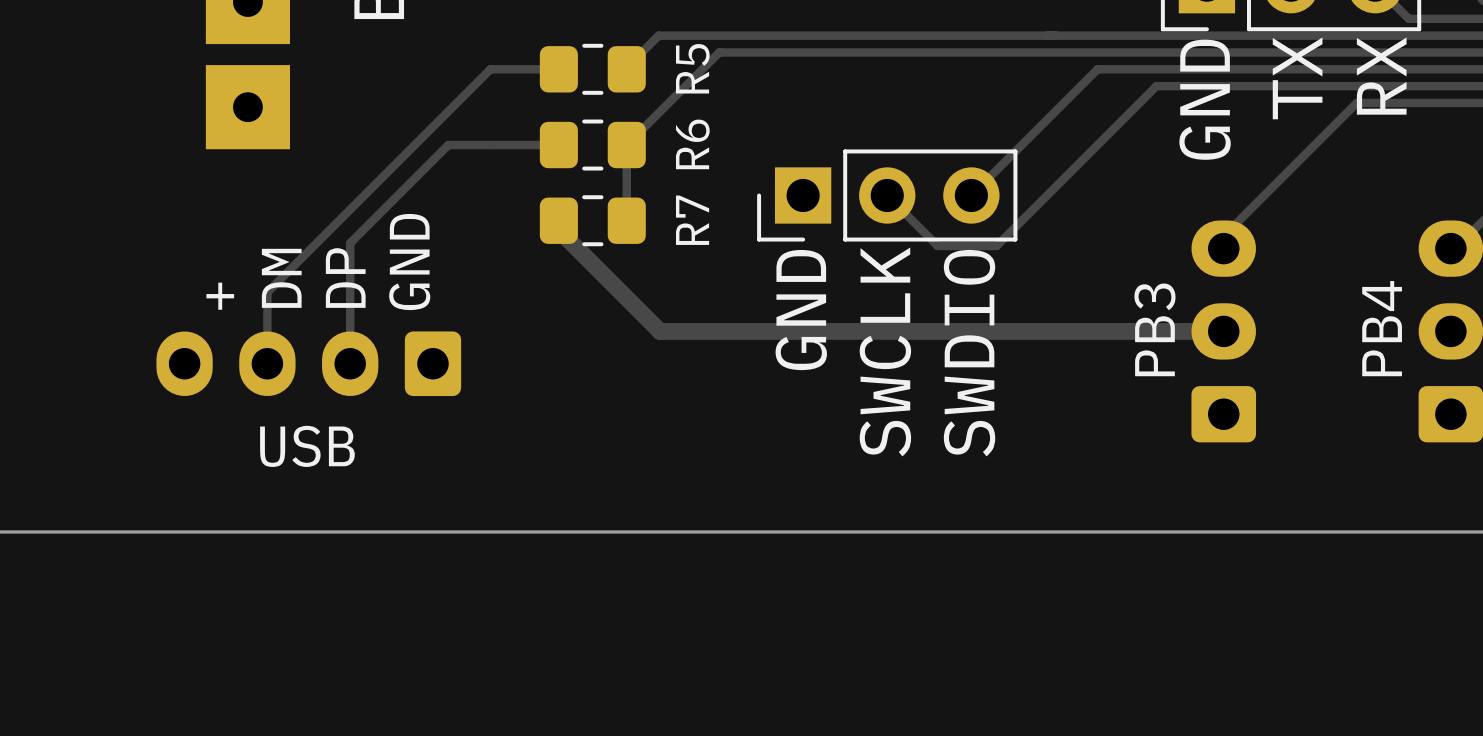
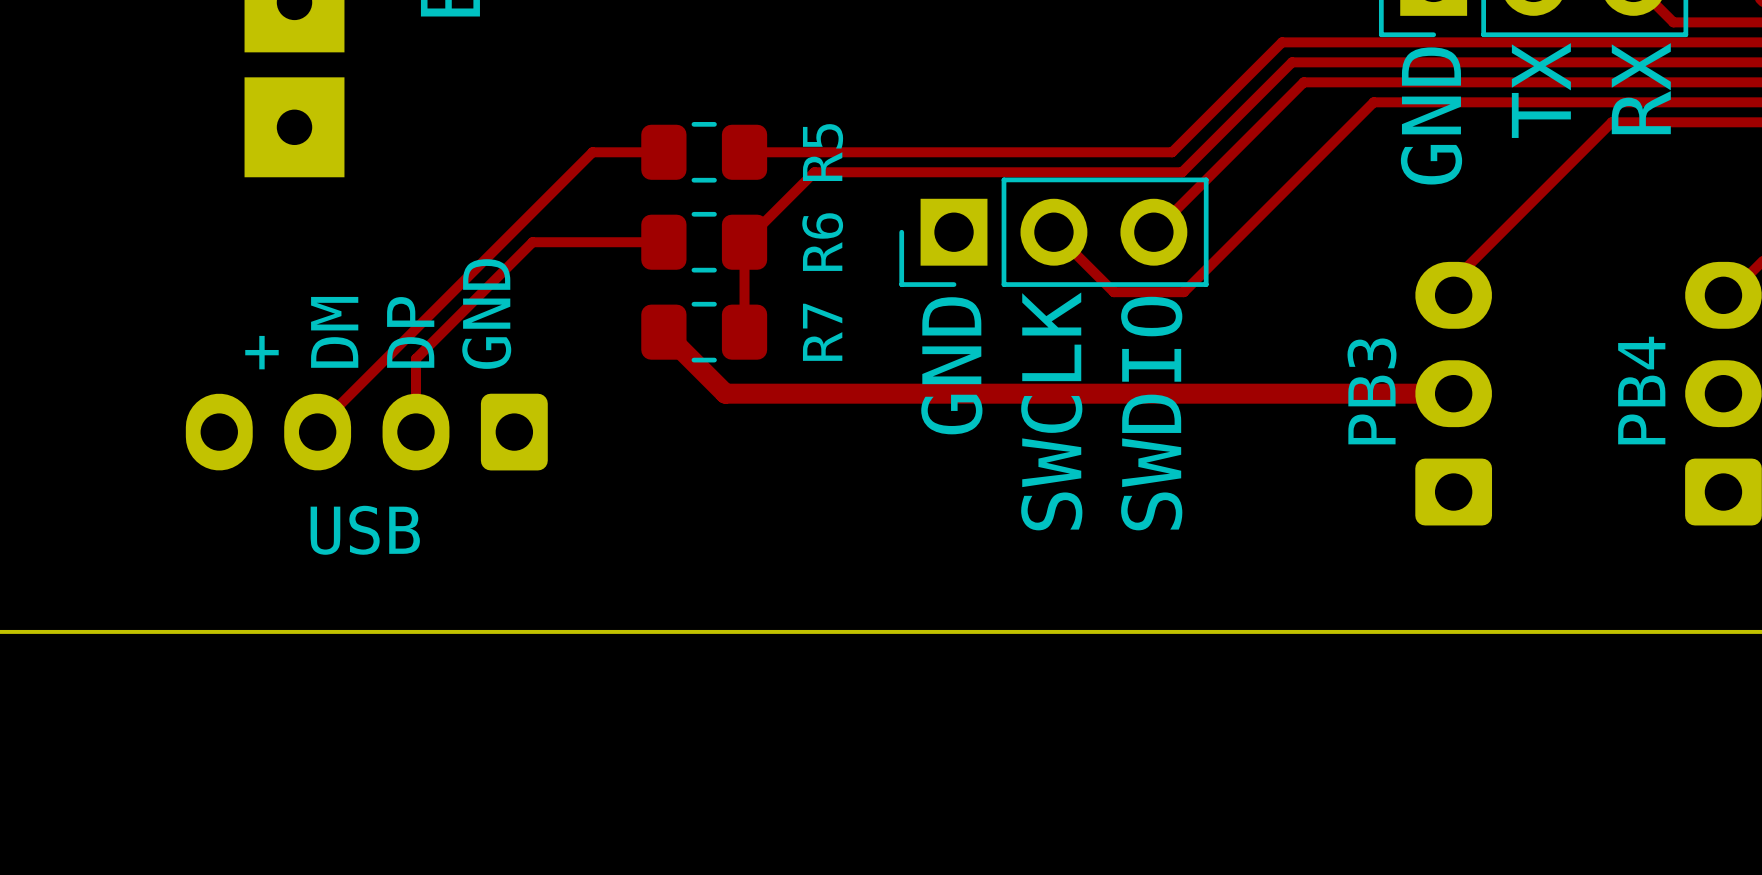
track: (1079, 35) (658, 35) (626, 69) -> (1282, 42) (1172, 152) (744, 152)
track: (1087, 52) (719, 52) (626, 145) (626, 203) -> (1292, 62) (1182, 172) (814, 172) (744, 242)
track: (558, 69) (490, 69) (267, 292) (267, 359) -> (663, 152) (592, 152) (317, 427)
R5 position: (592, 69) -> (704, 152)
track: (558, 145) (448, 145) (350, 243) (350, 302) -> (663, 242) (532, 242) (415, 358)
R6 position: (592, 145) -> (704, 242)
track: (558, 220) (558, 230) (659, 331) -> (663, 332) (725, 393) (783, 393)
R7 position: (592, 220) -> (704, 332)
track: none -> (744, 262) (744, 332)

